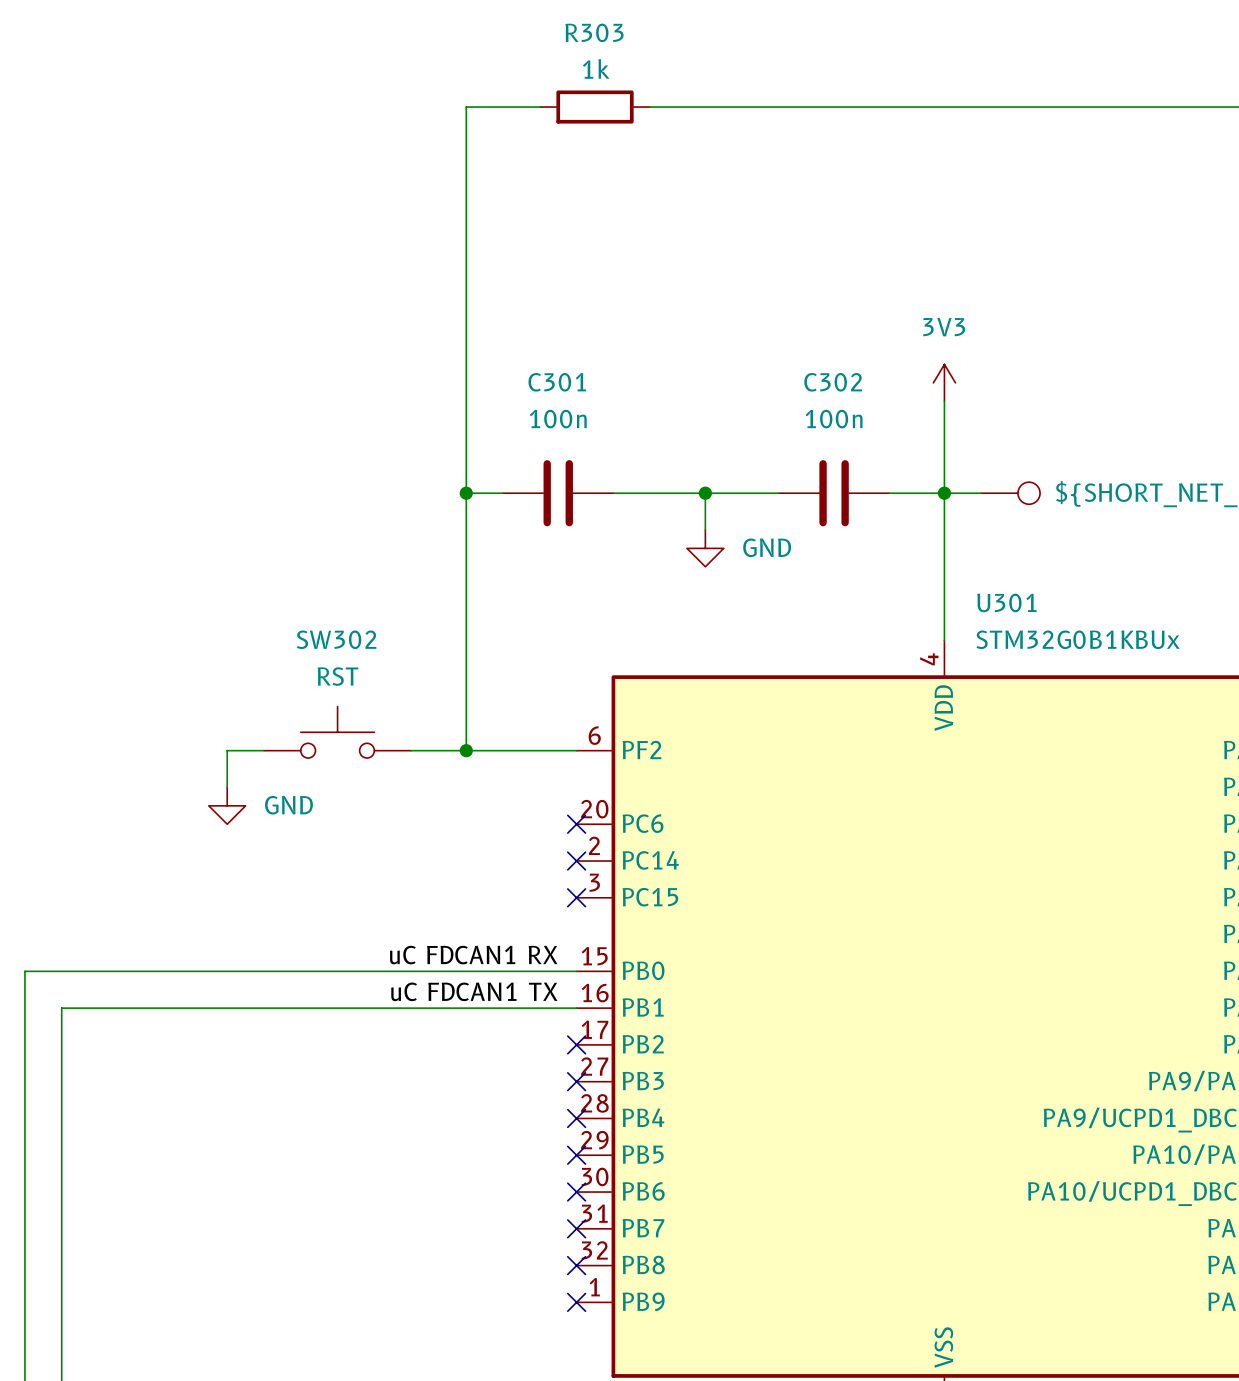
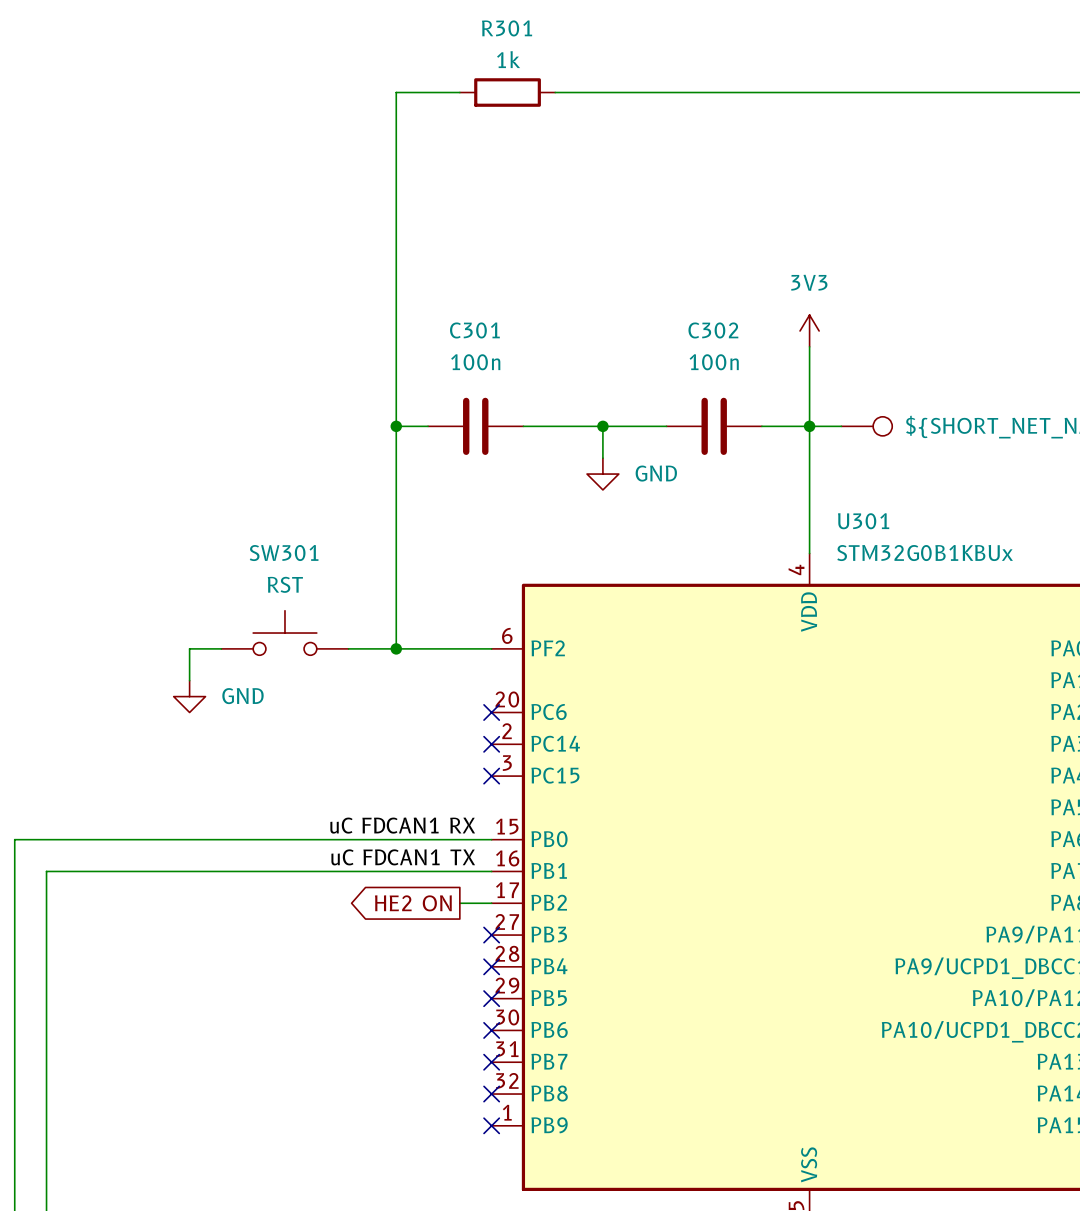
R303 name: R303 (594, 32) -> R301 (507, 28)
SW302 name: SW302 (336, 639) -> SW301 (284, 553)
wire: none -> (459, 903) (491, 903)
no-connect mark: (576, 1044) -> none
global label: none -> HE2 ON (413, 903)

